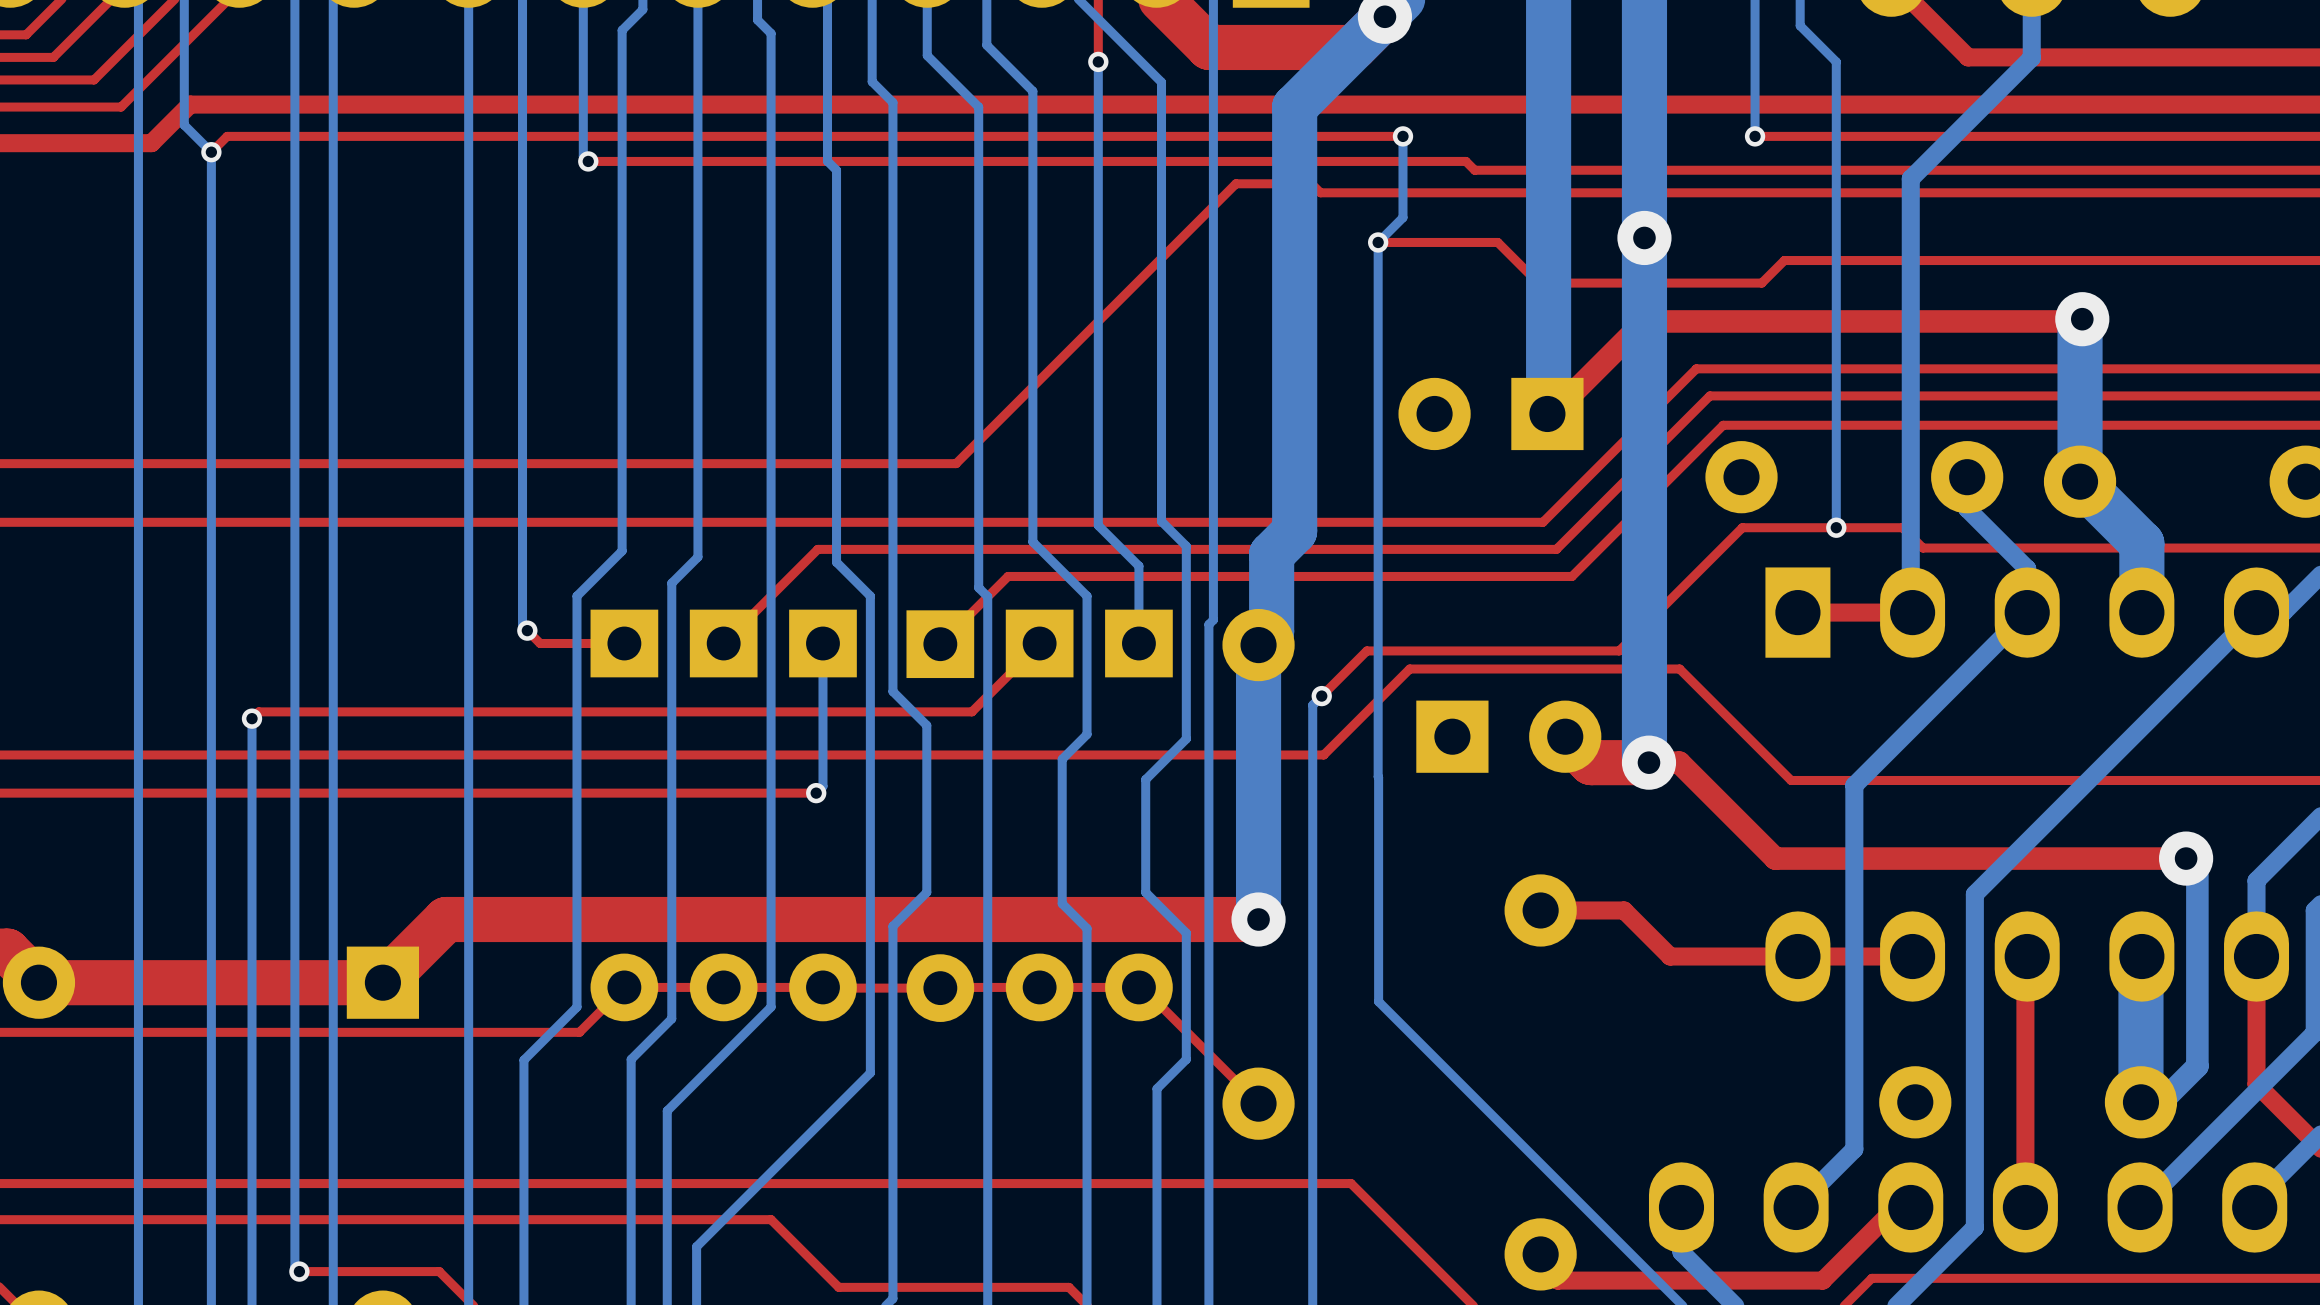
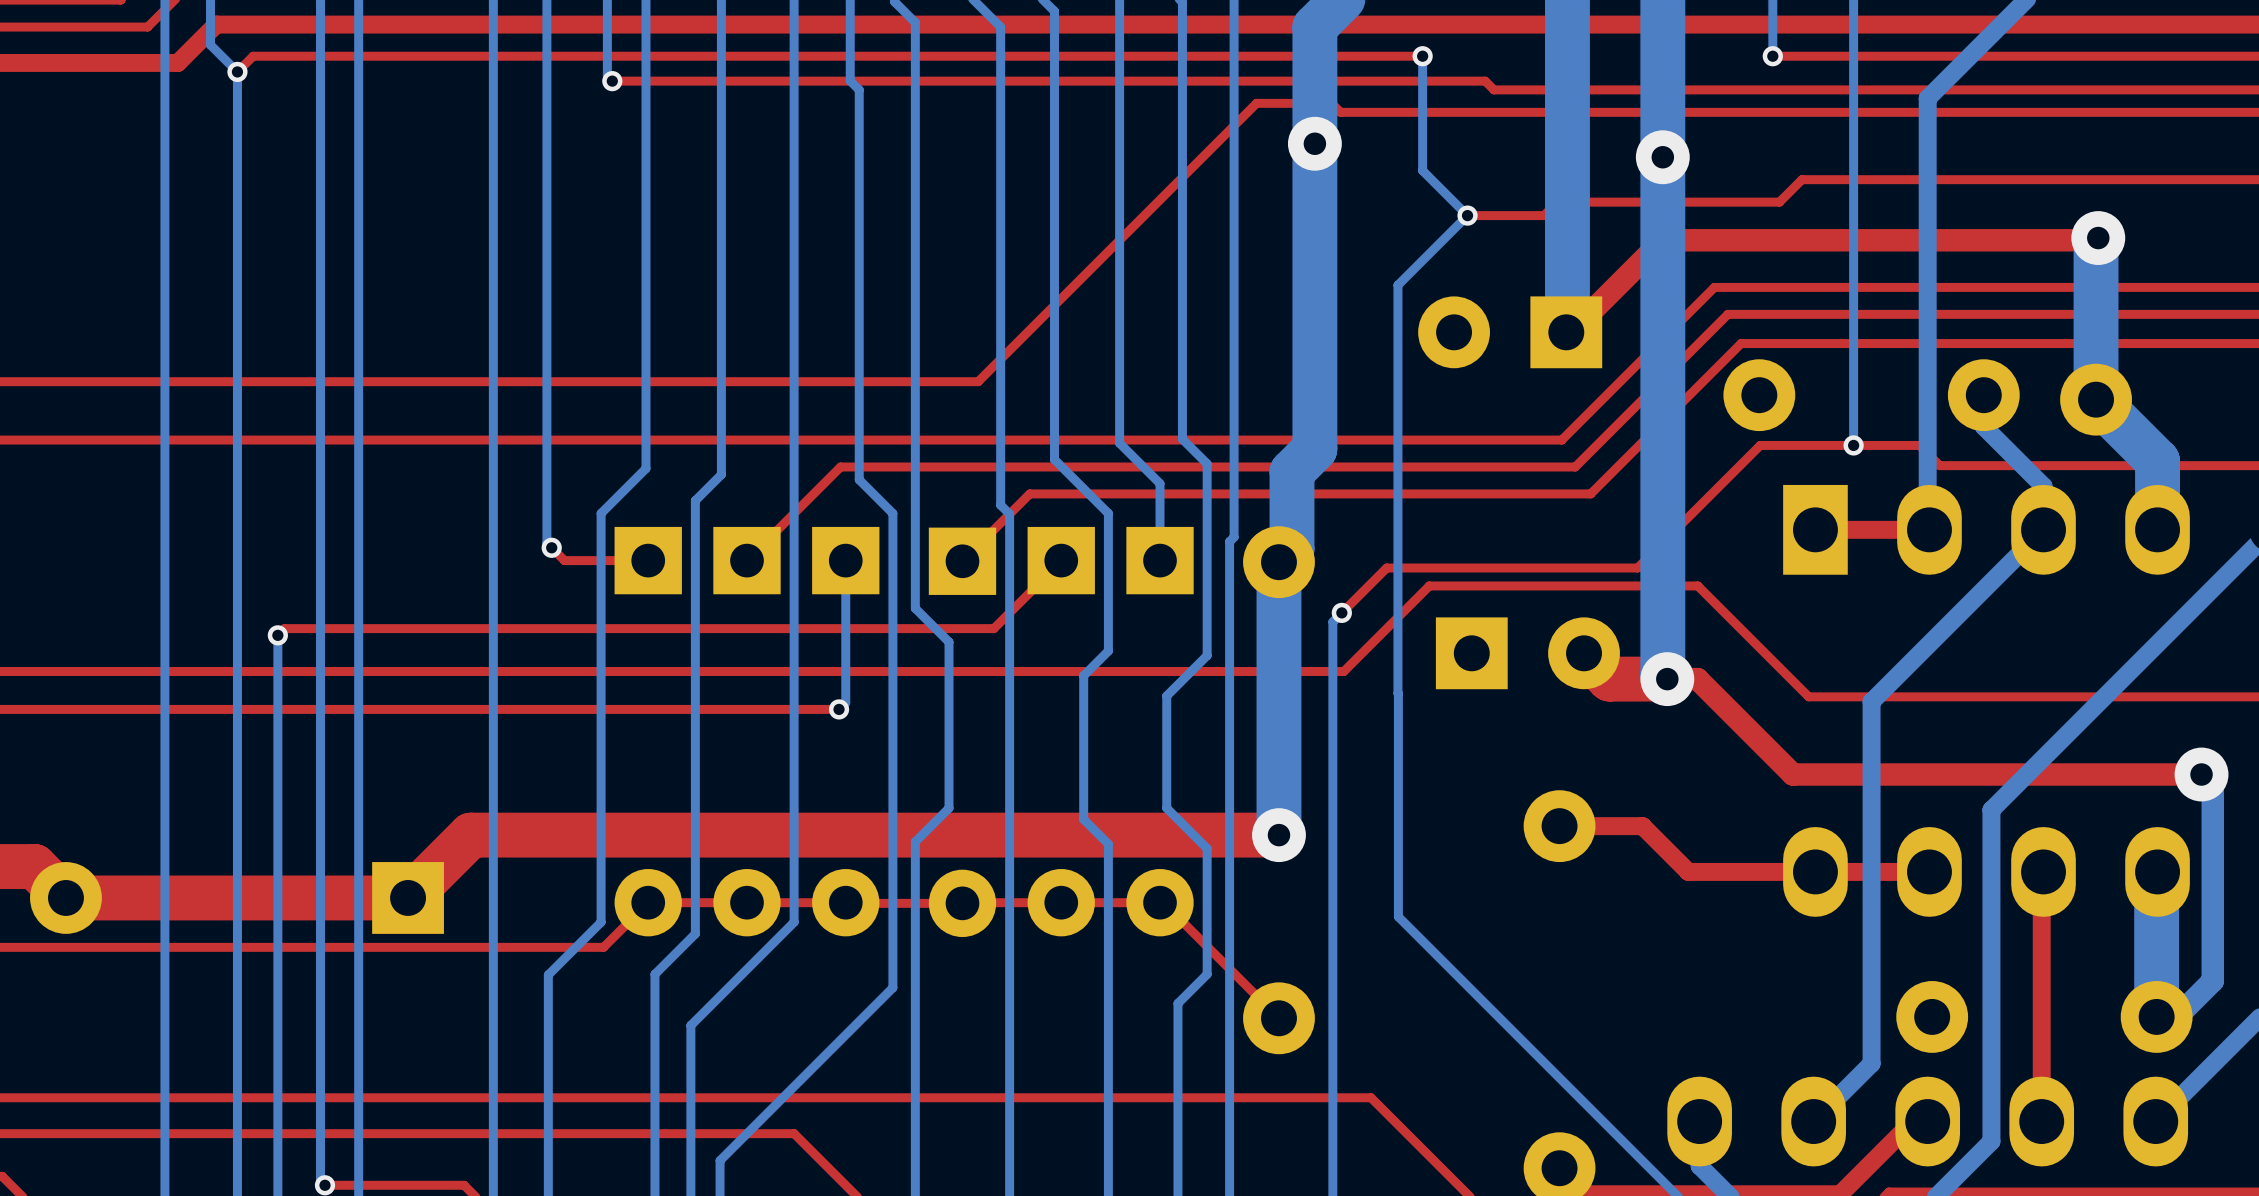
bottom track: (1402, 217) (1378, 242) (1378, 366) -> (1422, 137) (1422, 170) (1467, 215) (1397, 285)
via: none -> (1314, 143)
top track: (1378, 242) (1497, 242) (1538, 283) -> (1467, 215) (1543, 215) (1557, 202)
via position: (1378, 242) -> (1467, 215)

